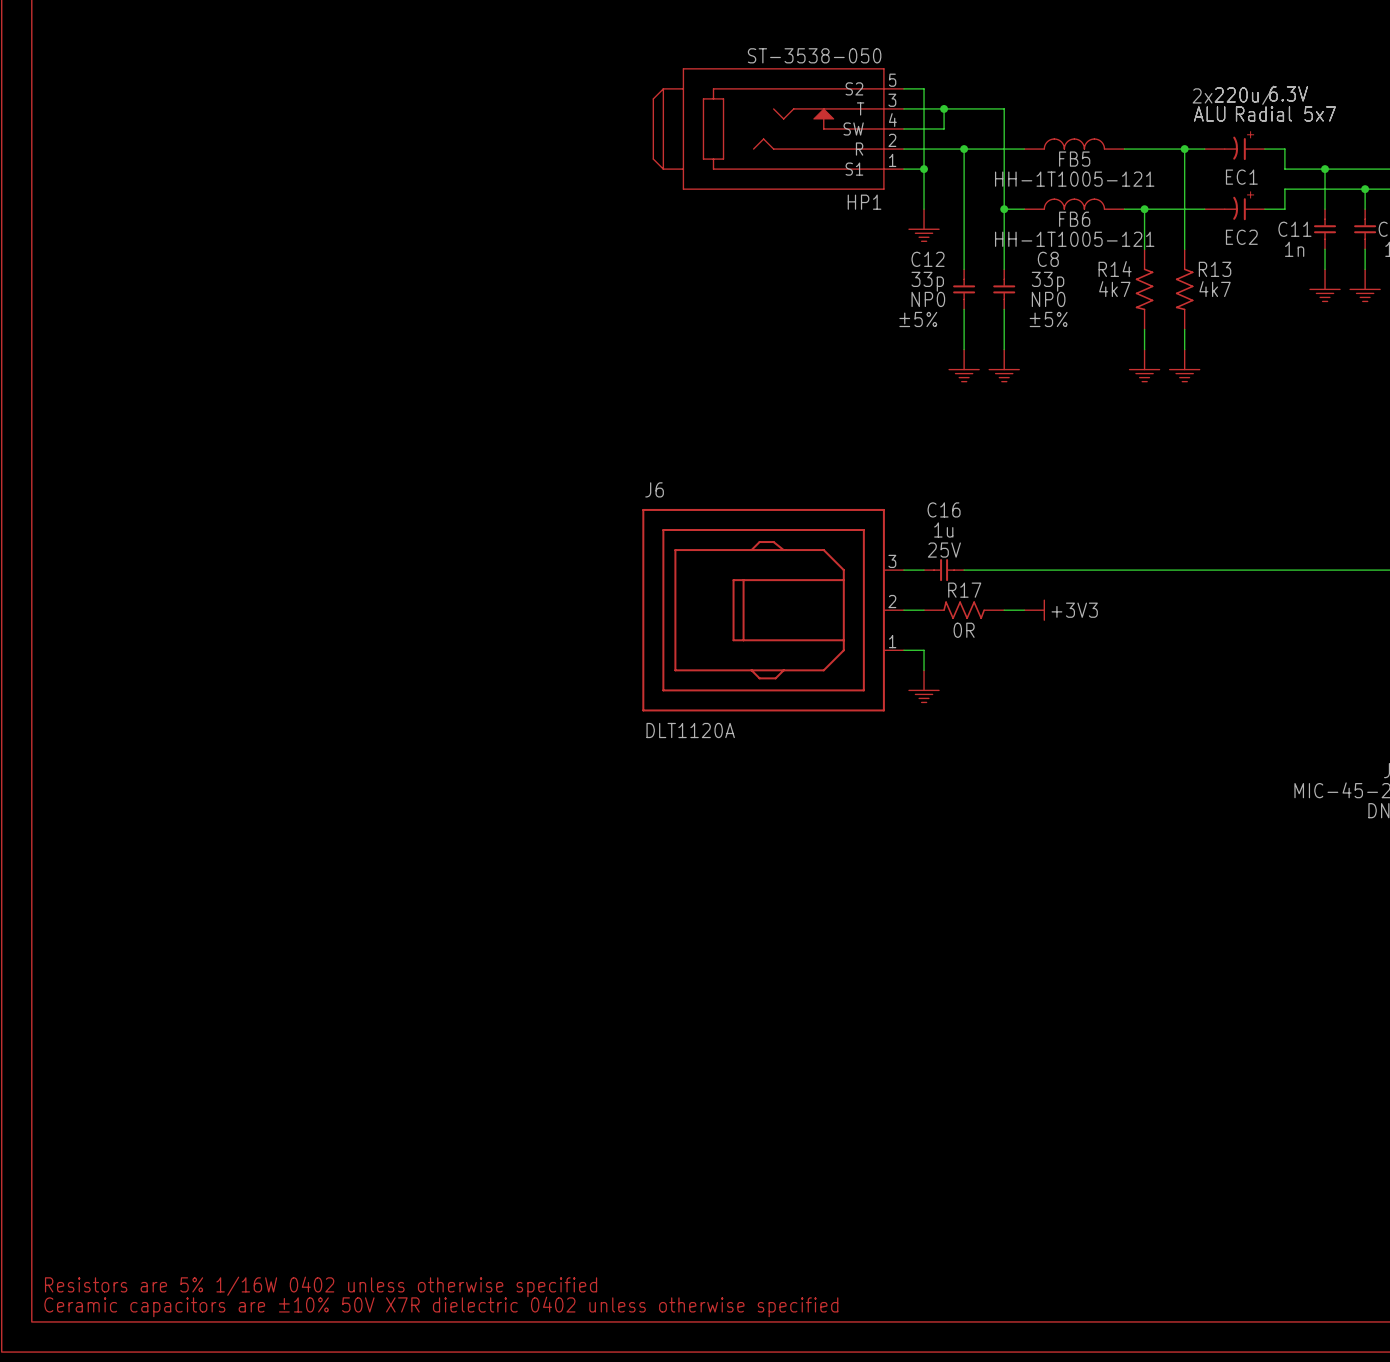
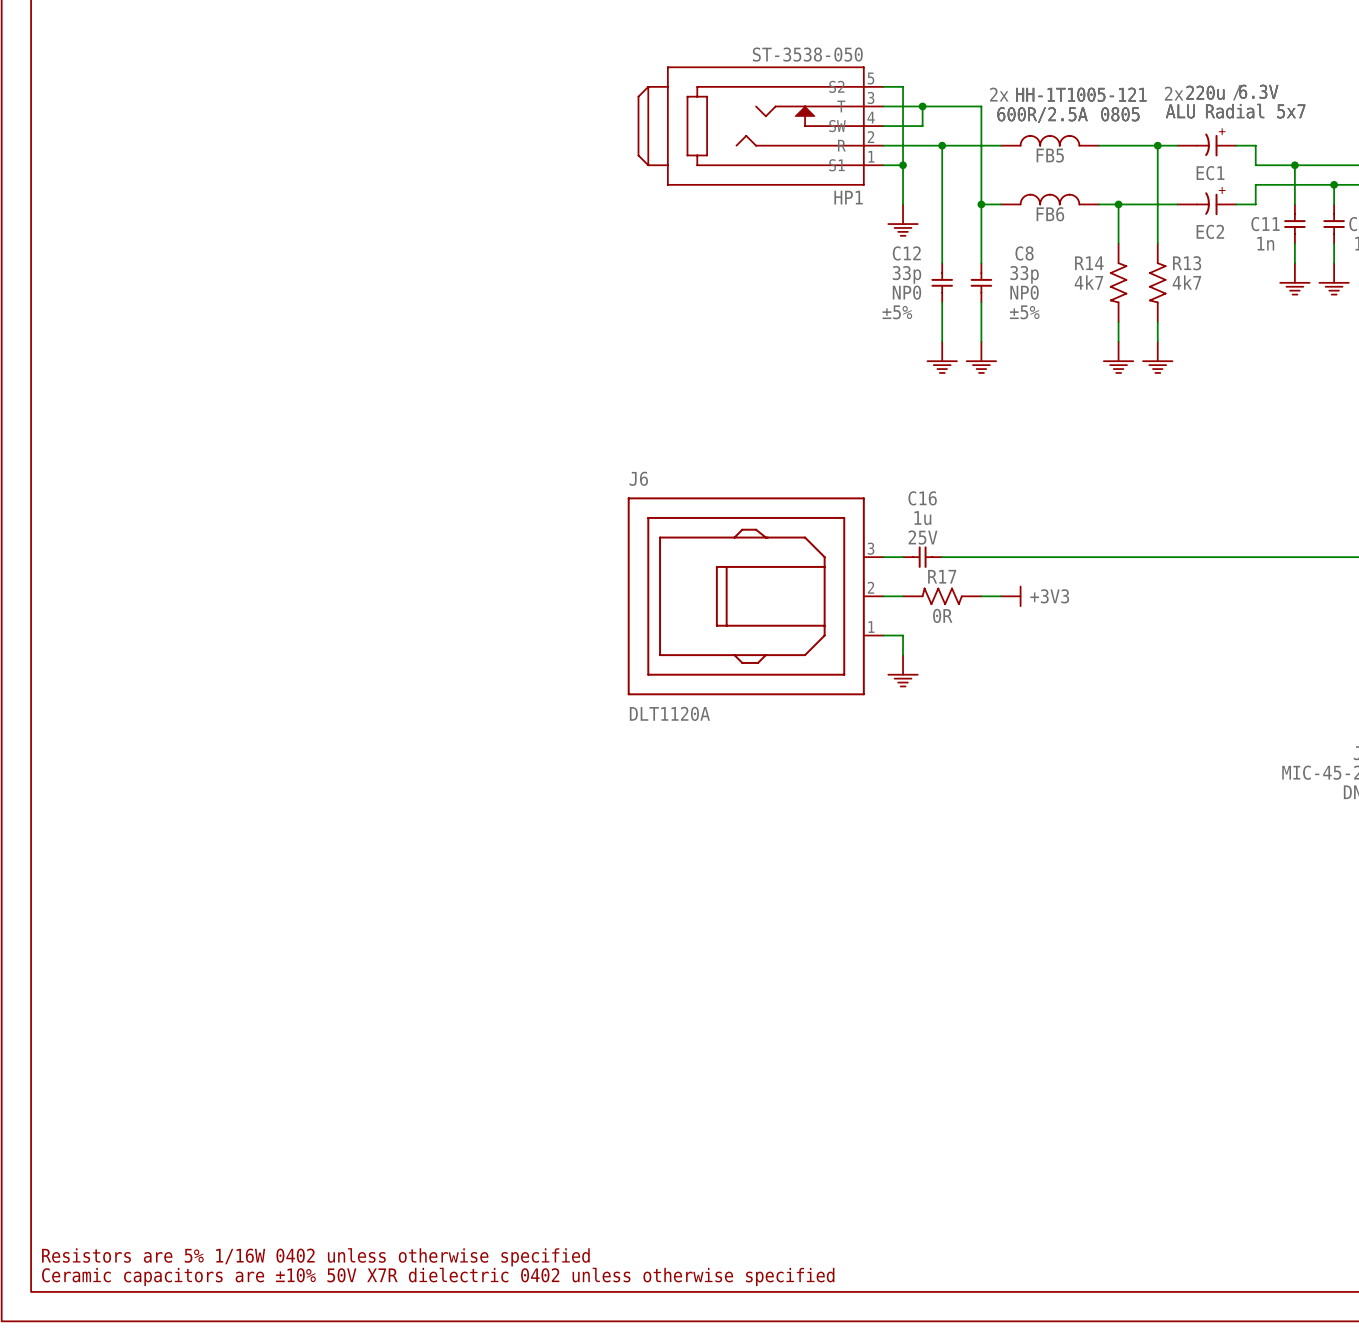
text: none -> 2x (999, 94)
FB5 text: none -> 0805 (1120, 114)
FB6 text: none -> 0805 (1120, 114)
FB5 text: none -> 600R/2.5A (1042, 115)
FB6 text: none -> 600R/2.5A (1042, 115)
FB5 value position: HH-1T1005-121 (1074, 179) -> HH-1T1005-121 (1081, 94)
FB6 value position: HH-1T1005-121 (1074, 239) -> HH-1T1005-121 (1081, 94)

